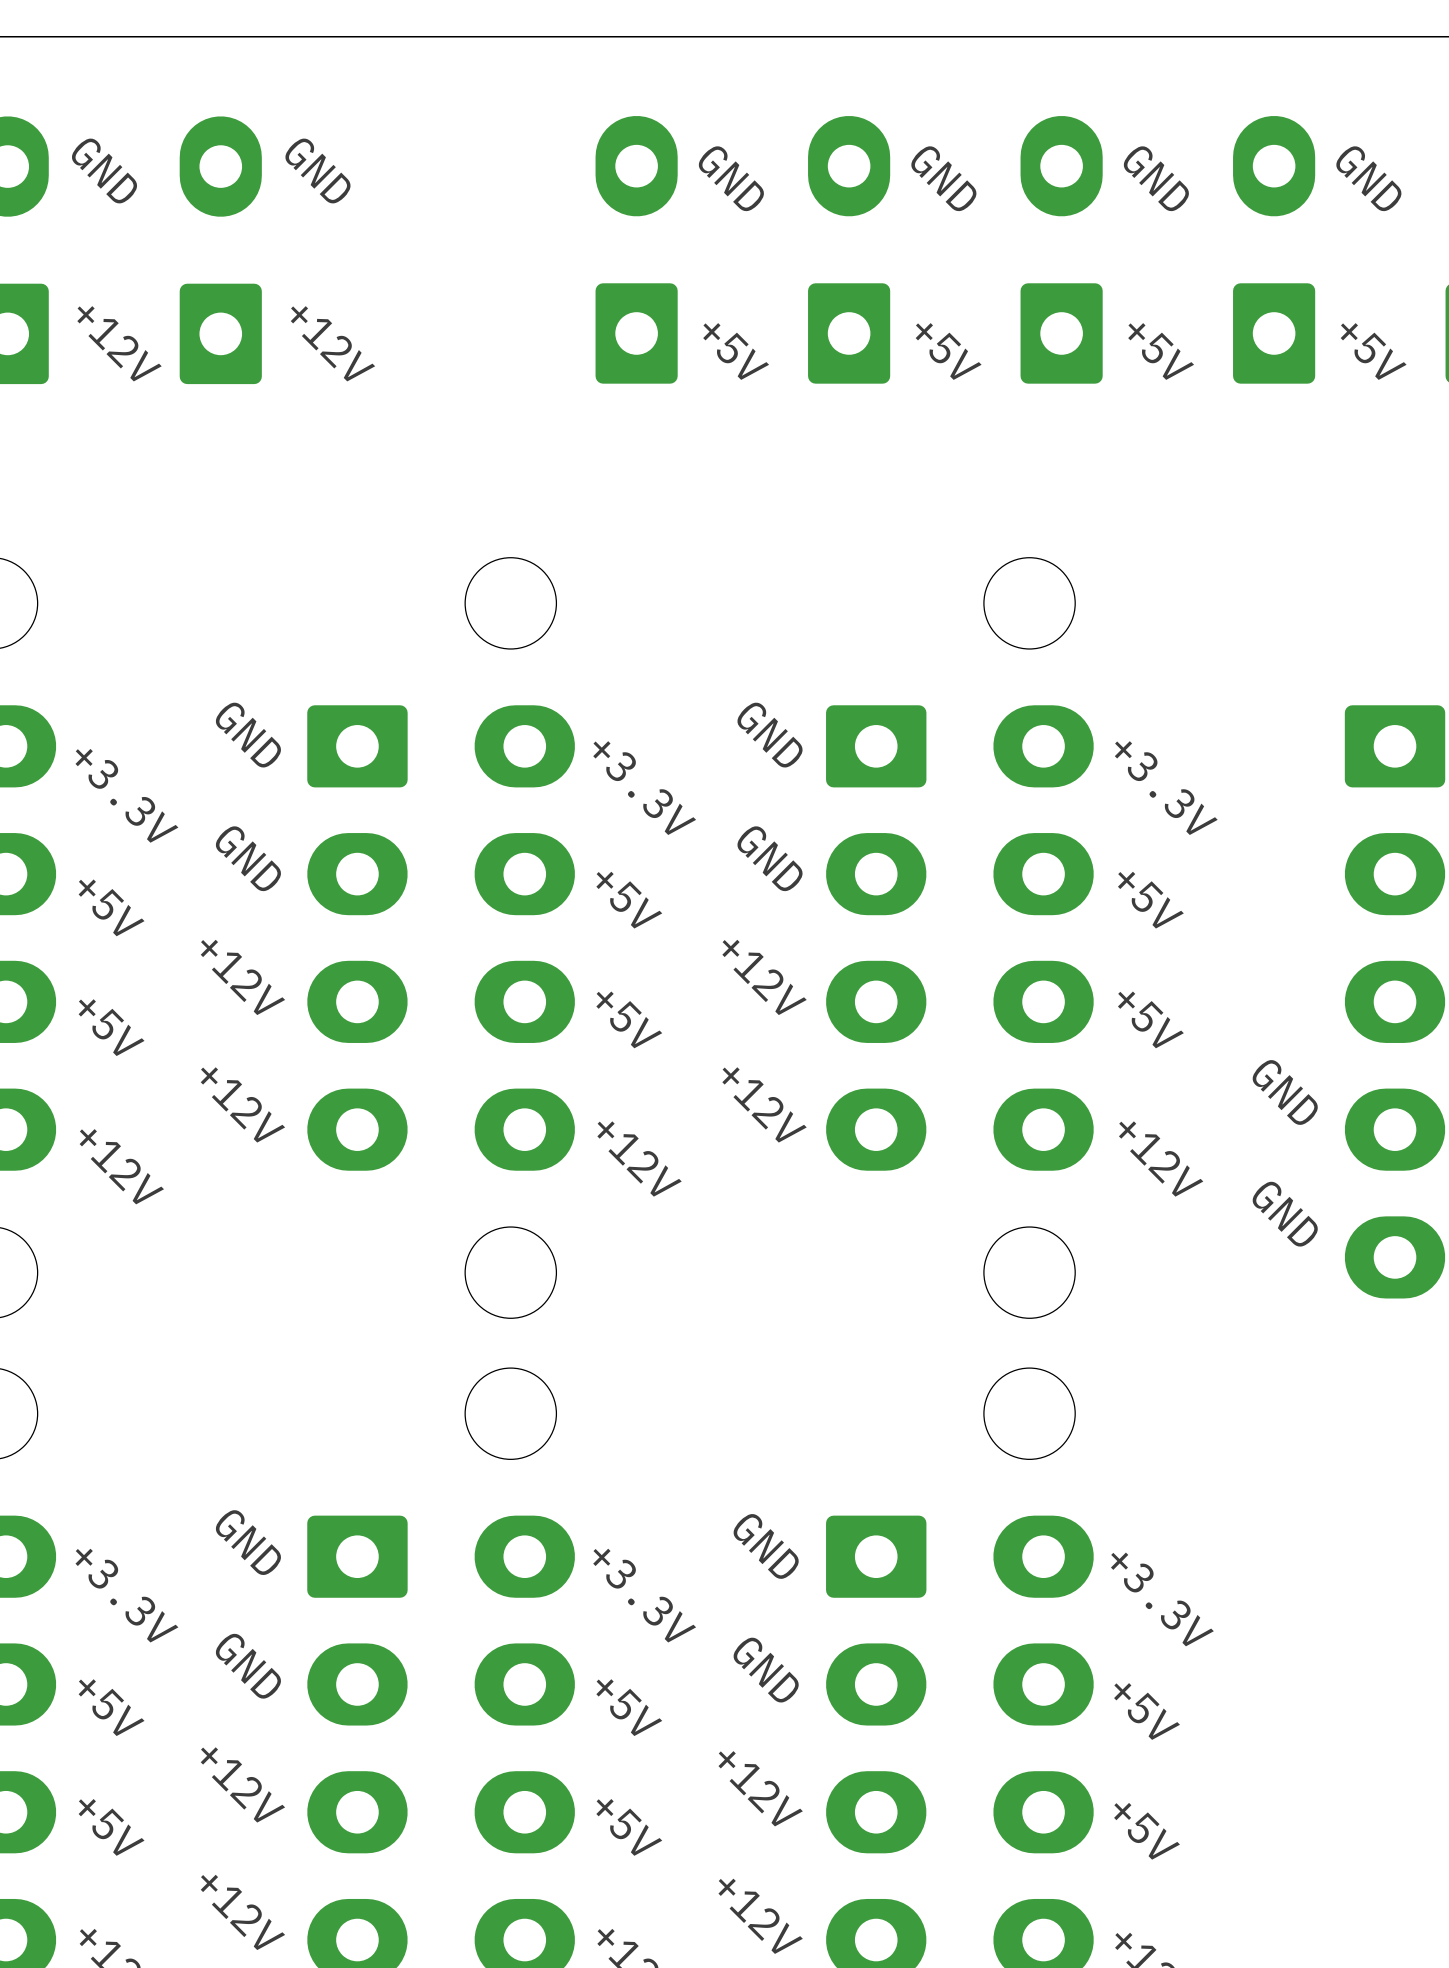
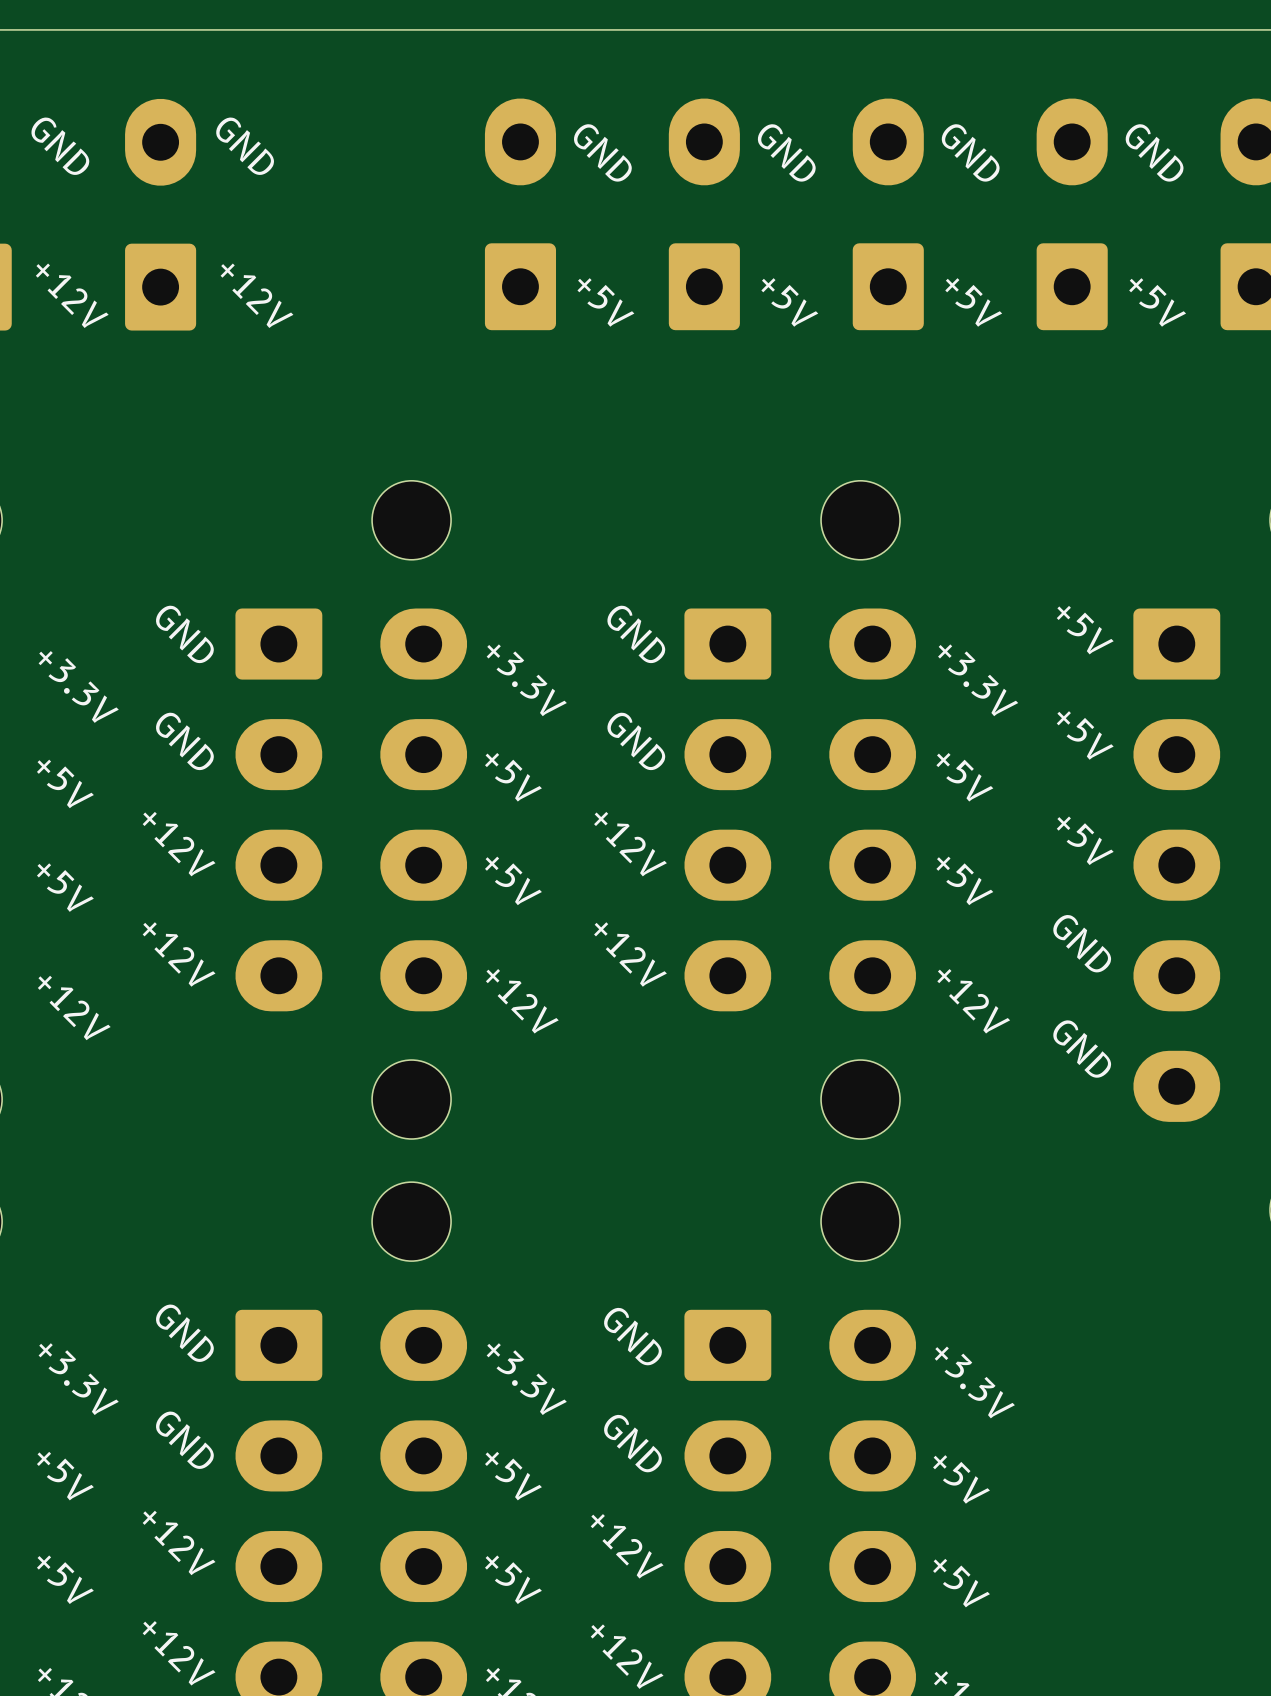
text: none -> +5V (1085, 630)
text: none -> +5V (1085, 735)
text: none -> +5V (1085, 840)

